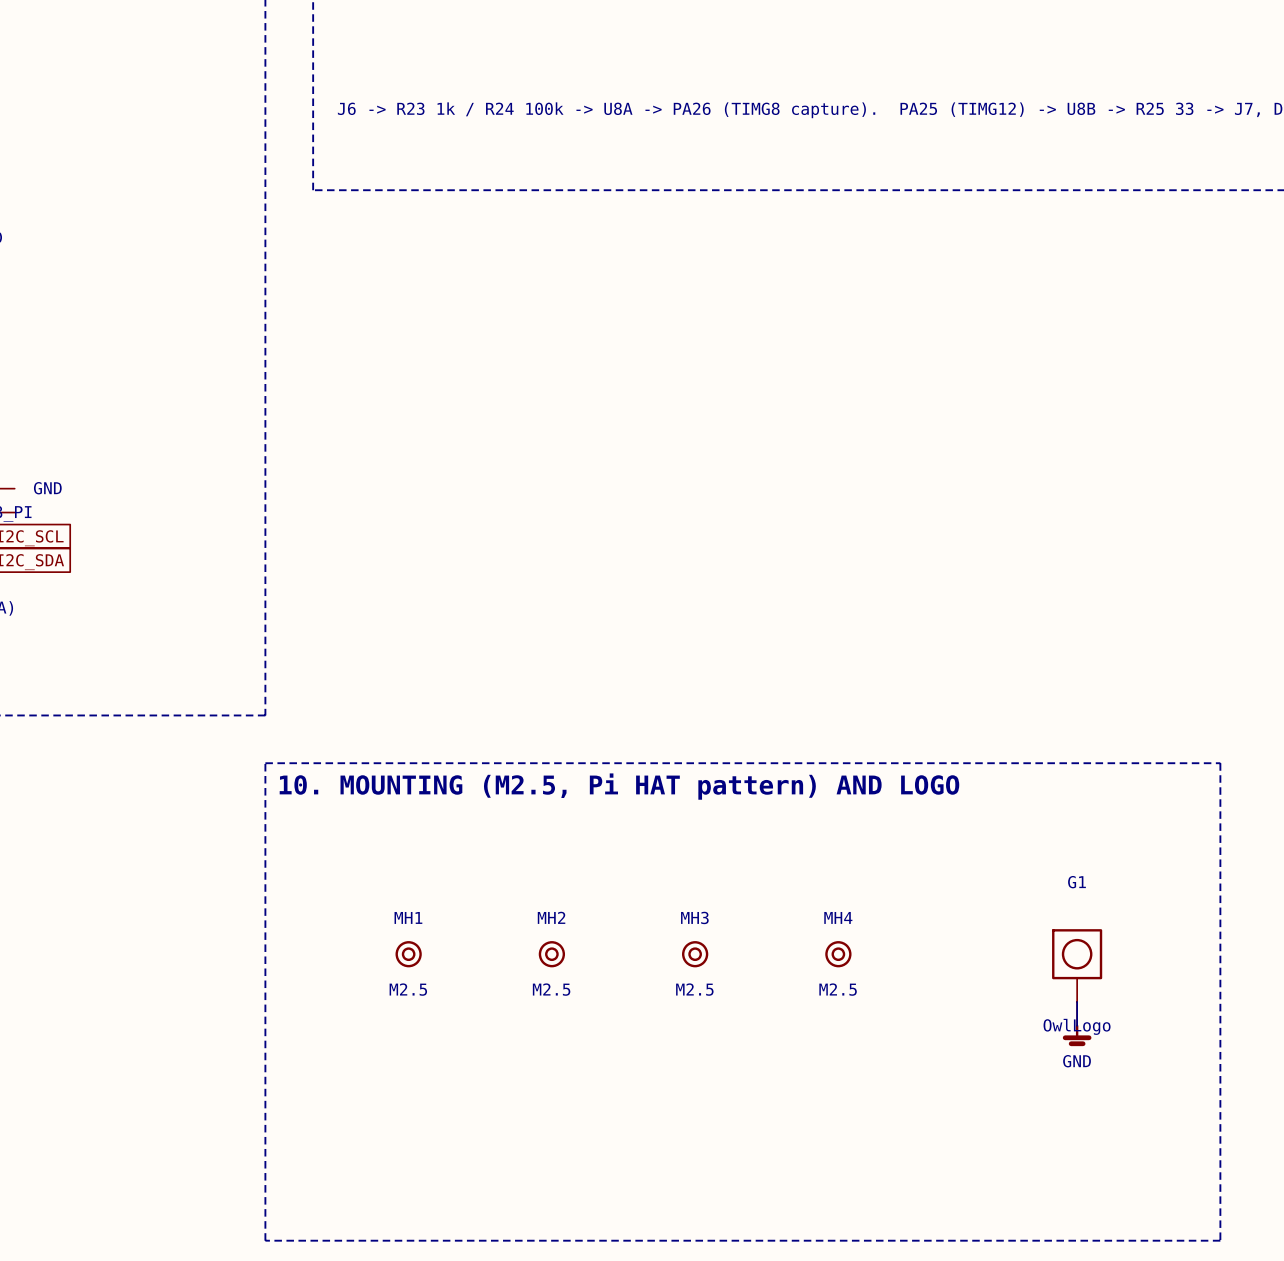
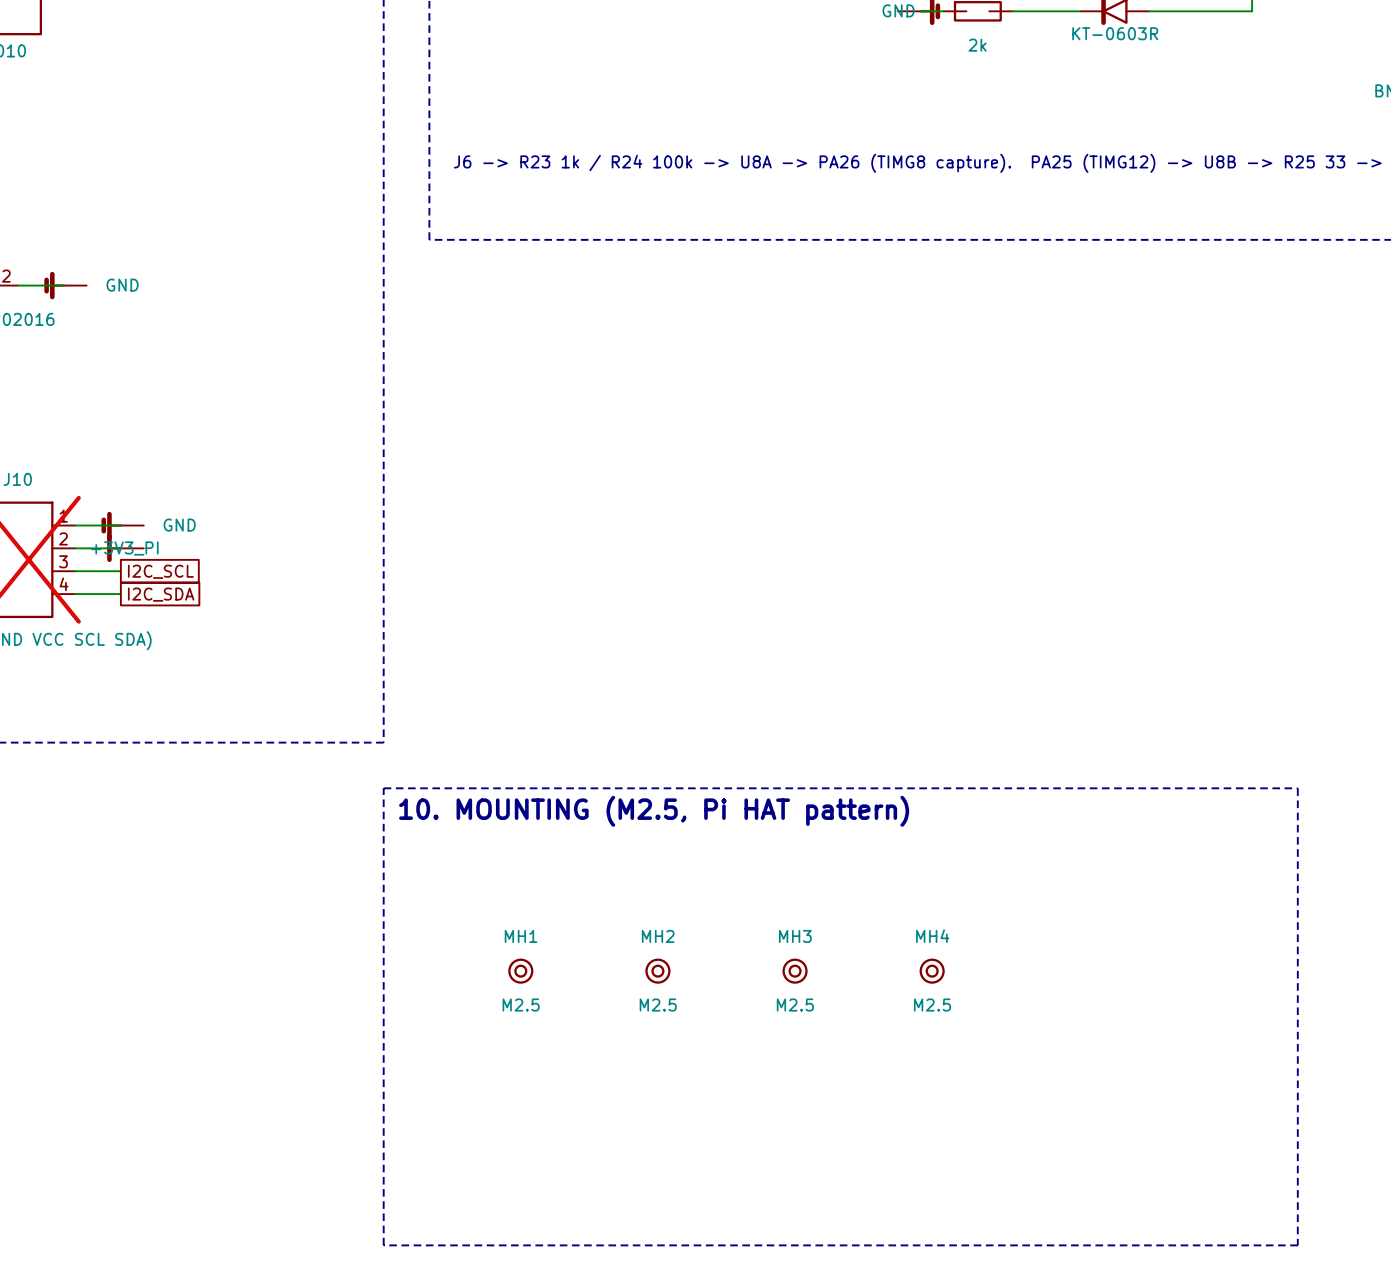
text: 10. MOUNTING (M2.5, Pi HAT pattern) AND LOGO (619, 786) -> 10. MOUNTING (M2.5, Pi HAT pattern) (654, 811)
G1: OwlLogo (1077, 965) -> none
wire: (1077, 1001) (1077, 1025) -> none
power symbol: GND (1077, 1024) -> none

